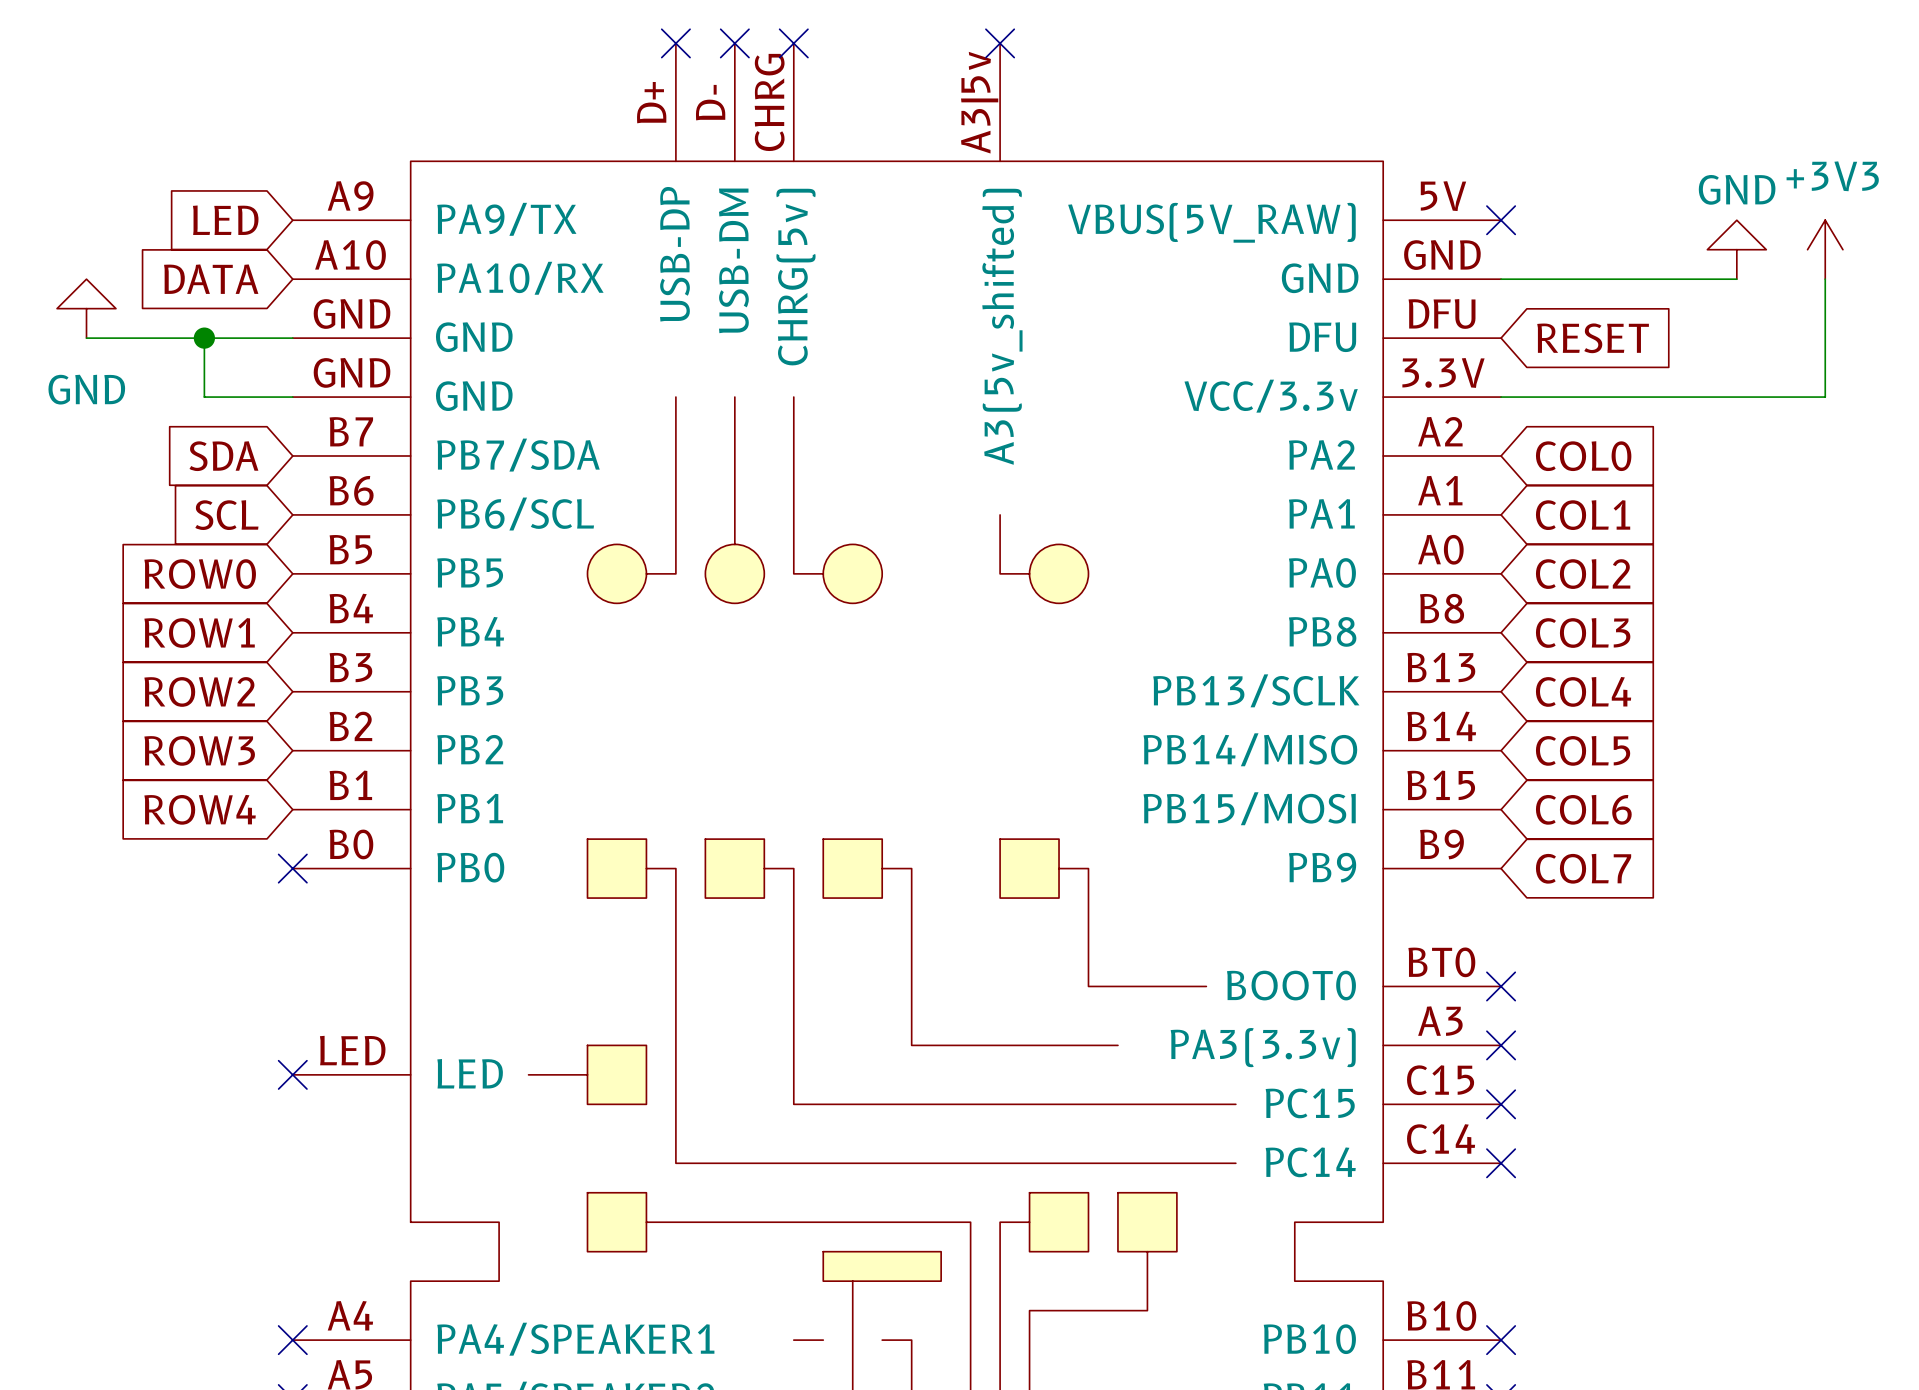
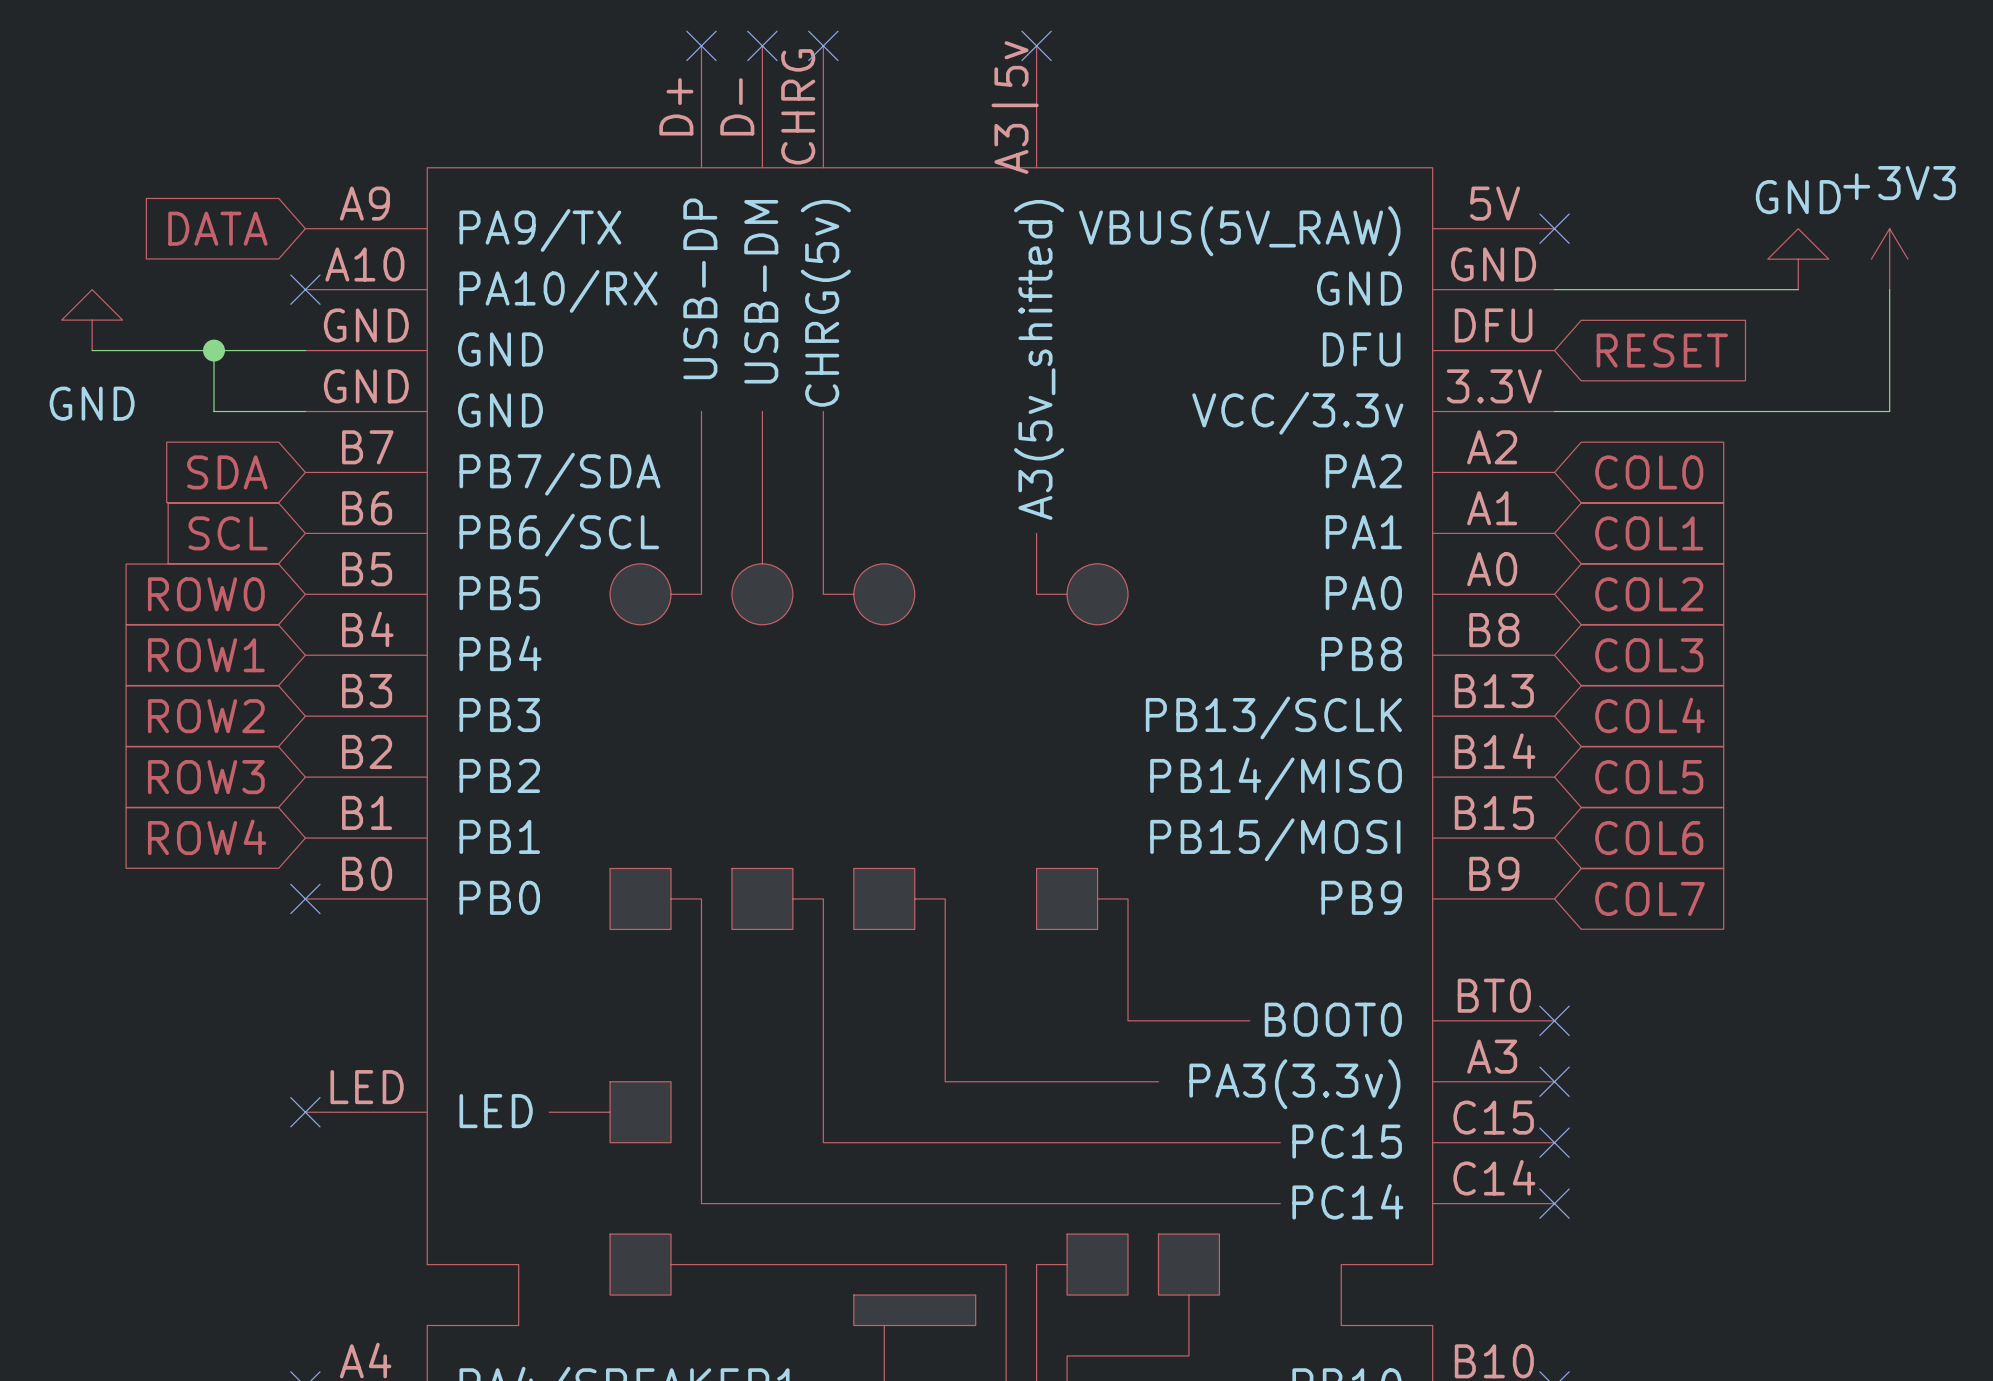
global label: LED (225, 220) -> DATA (217, 228)
global label: DATA (211, 279) -> none
no-connect mark: none -> (305, 289)

